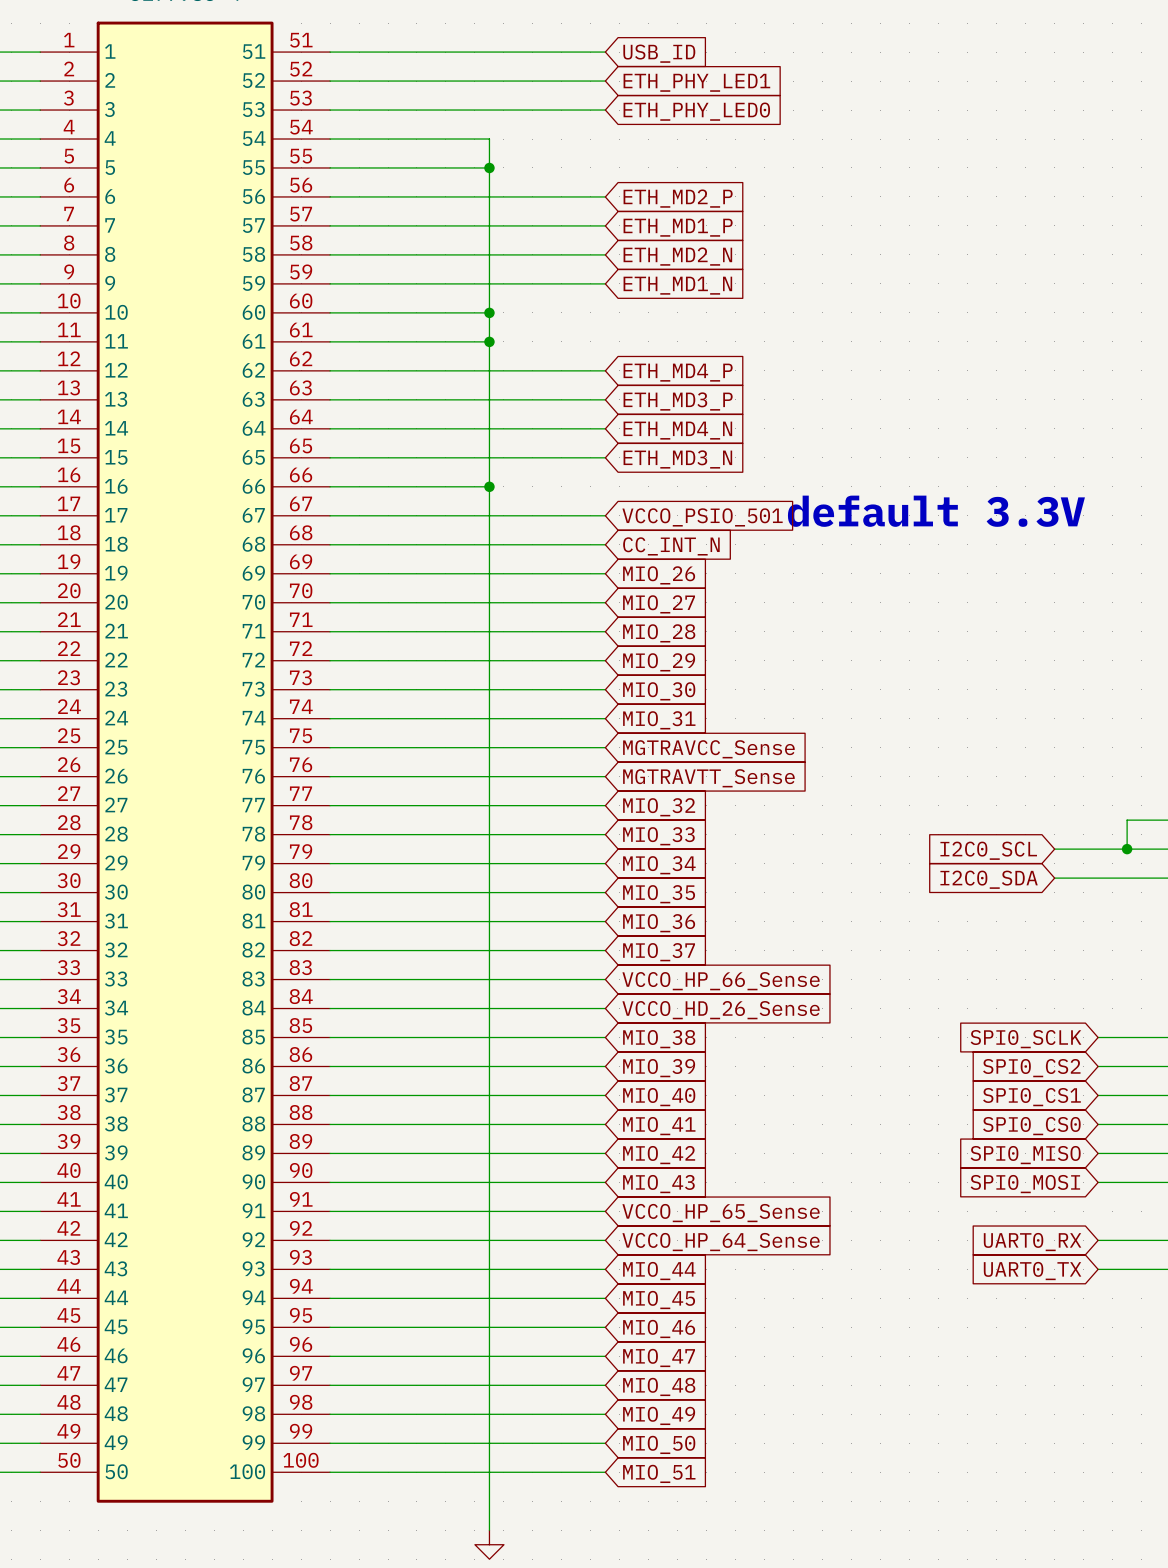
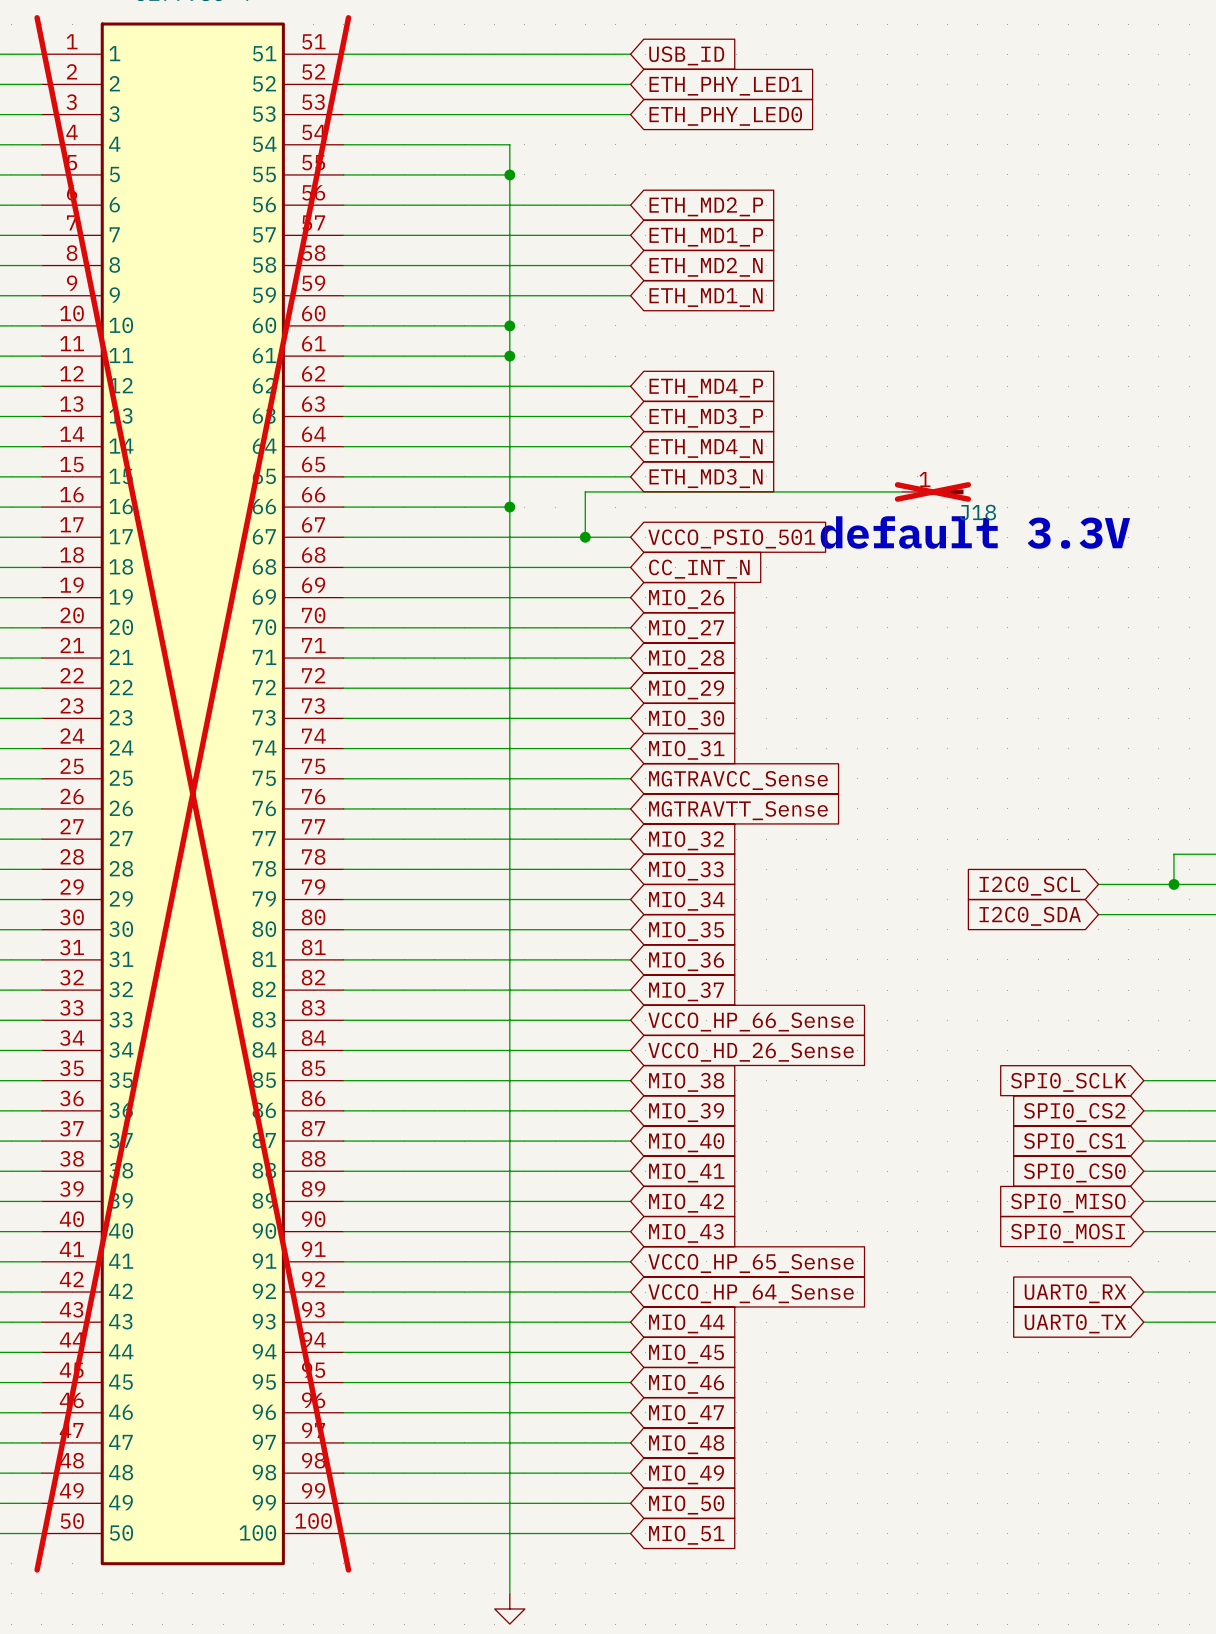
wire: none -> (902, 491) (585, 491) (585, 537)
J18: none -> (932, 491)
junction: none -> (585, 537)
part do-not-place cross: none -> (192, 793)

